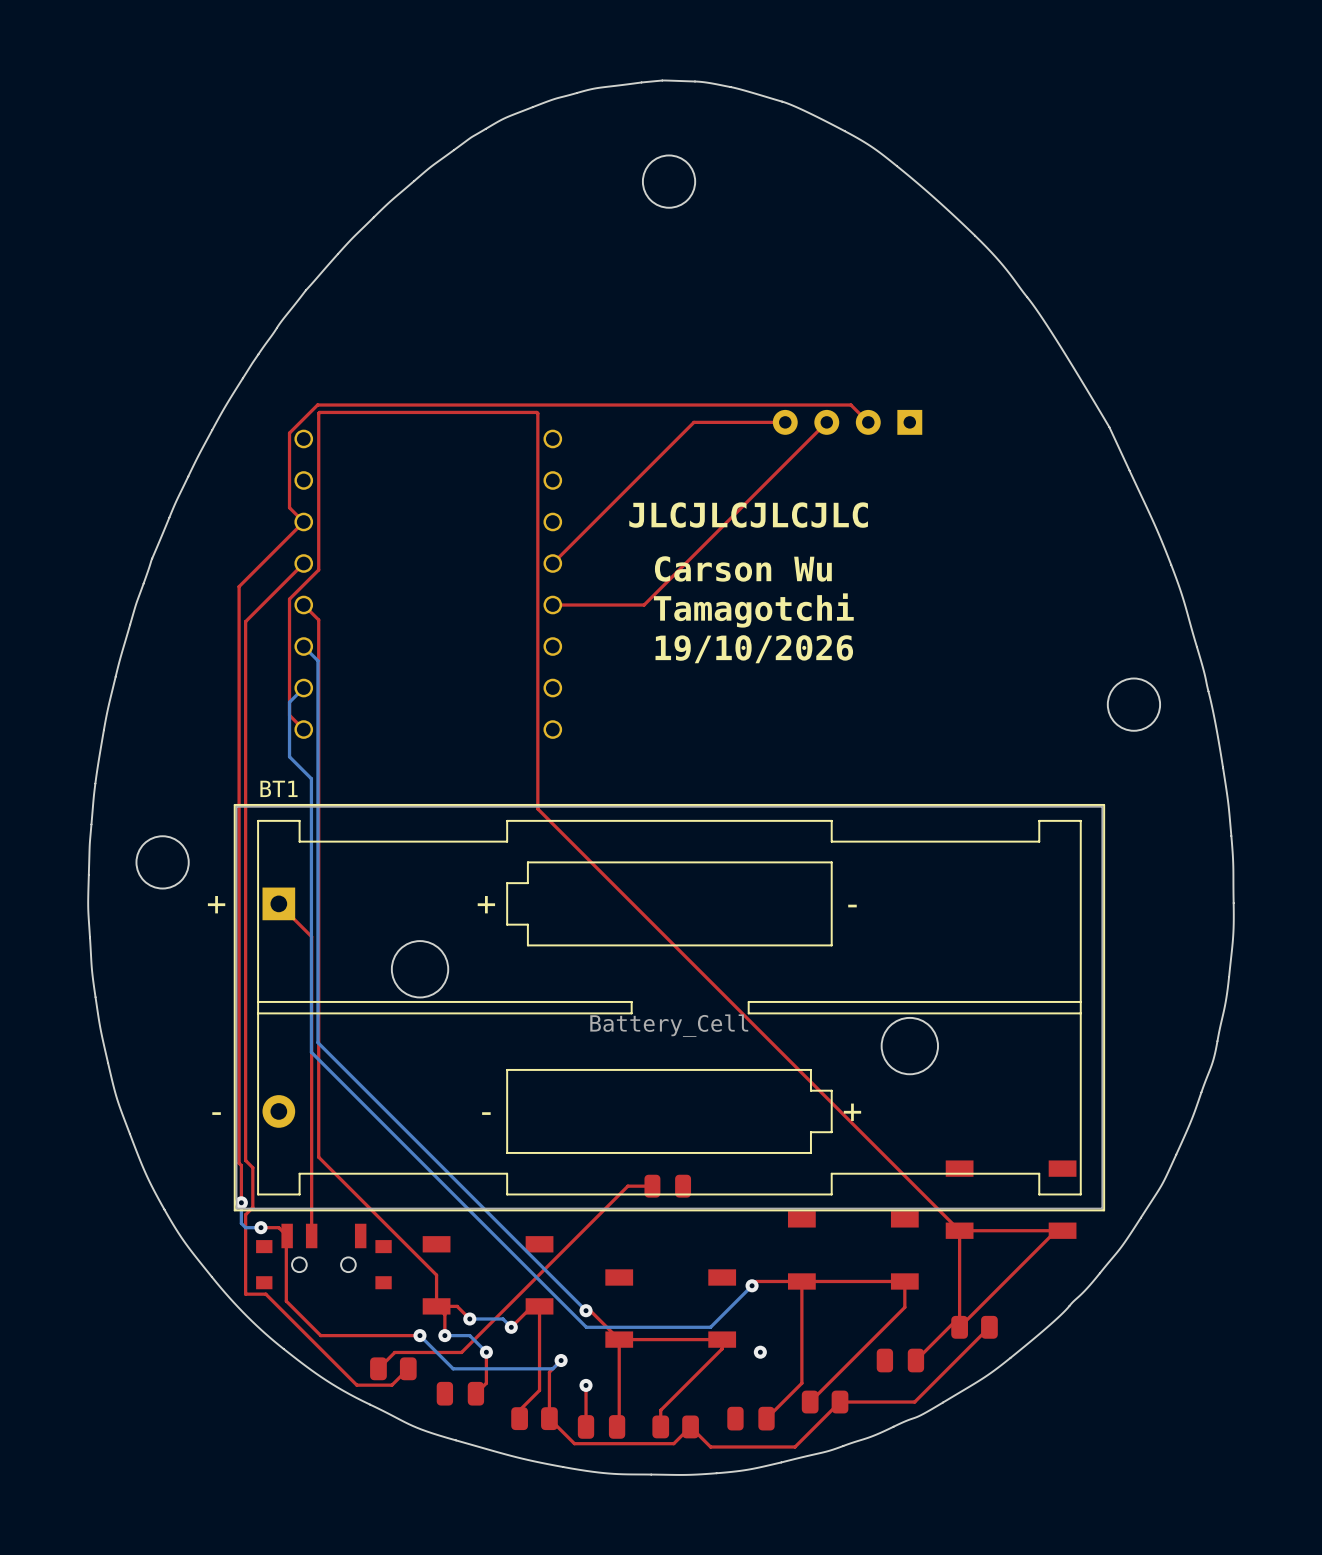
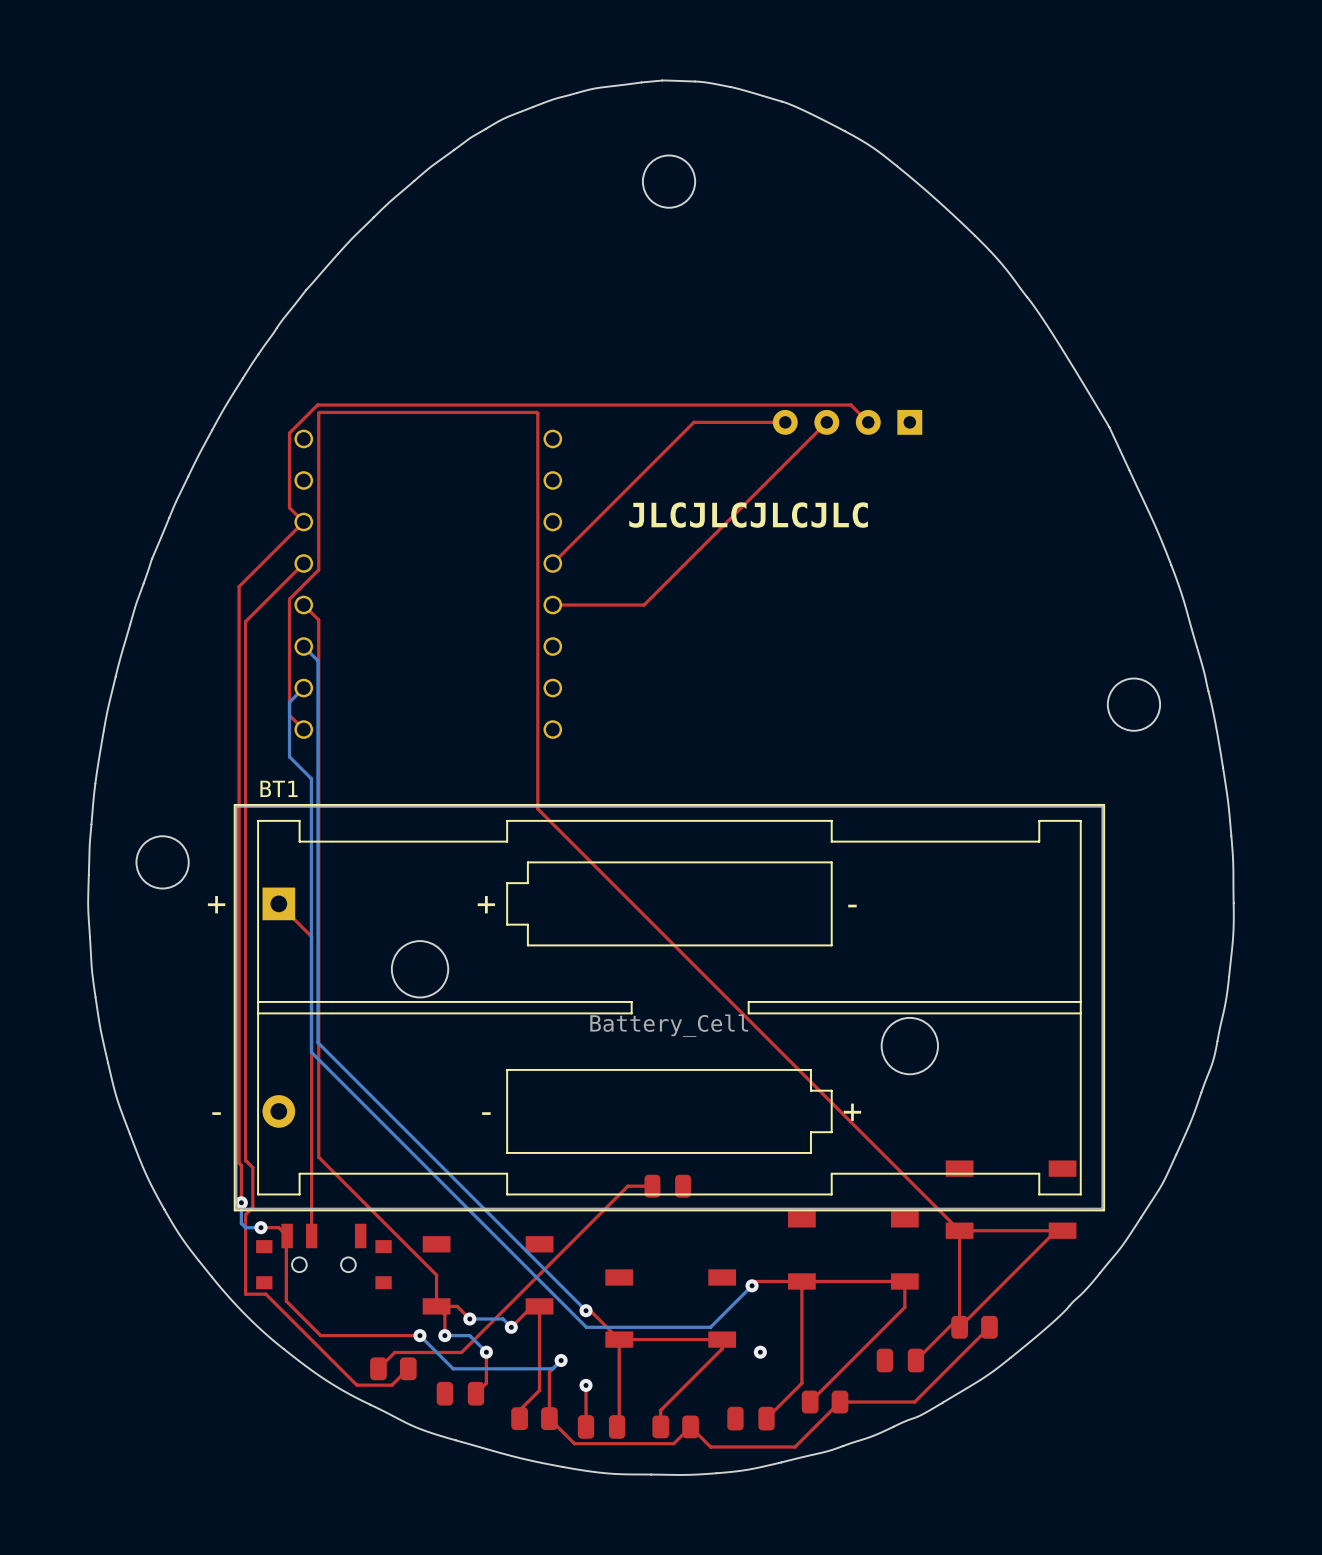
text: Carson Wu (743, 568) -> none
text: Tamagotchi (753, 610) -> none
text: 19/10/2026 (754, 649) -> none

